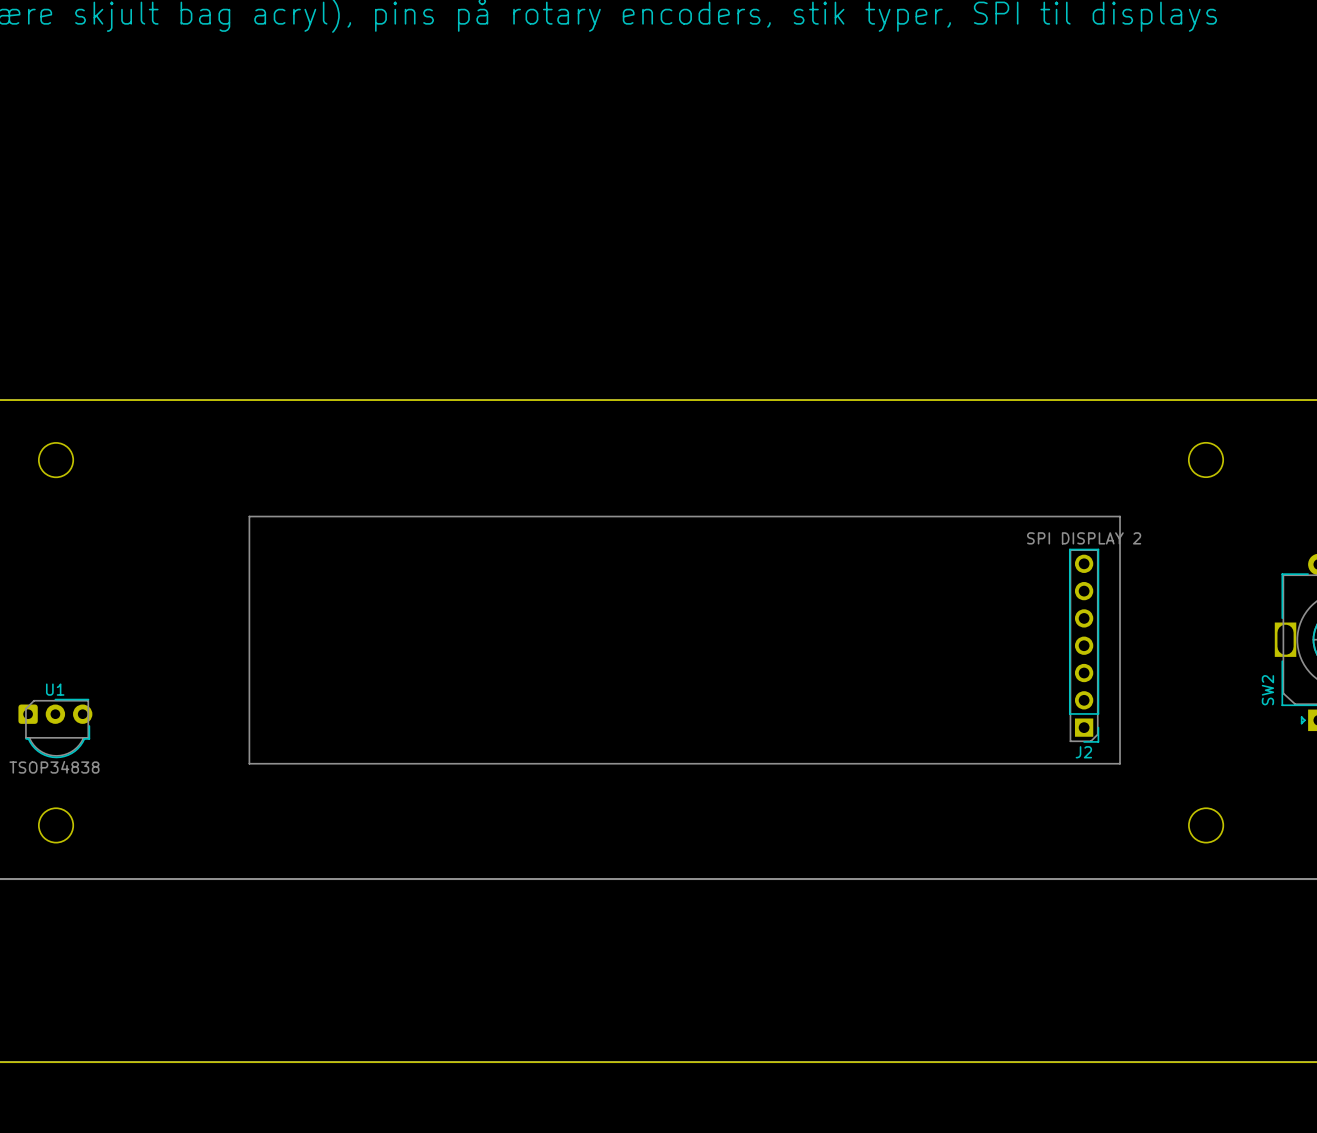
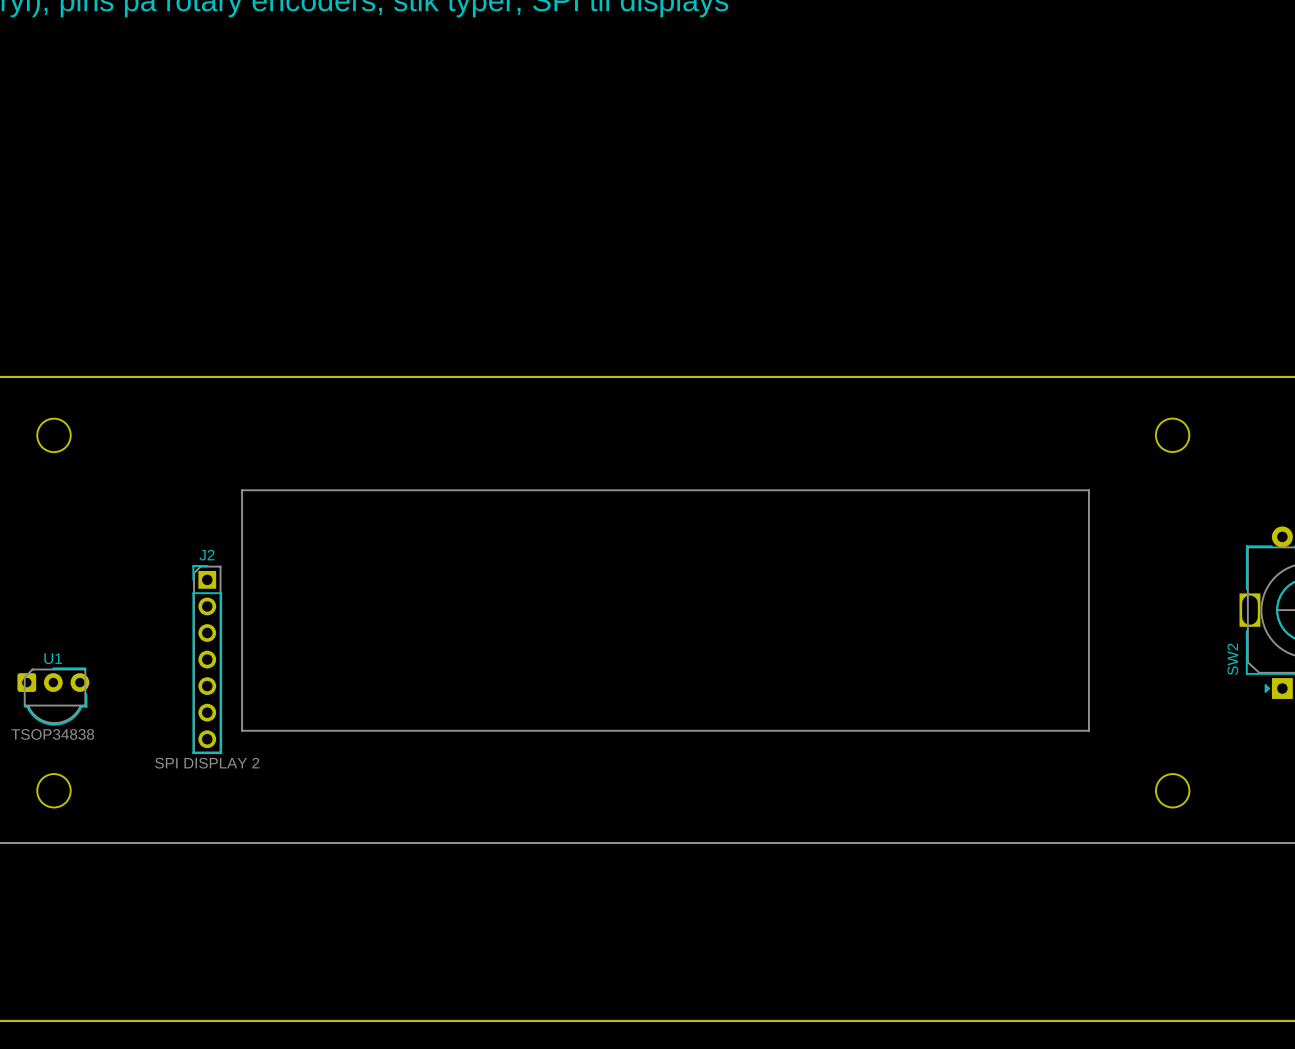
J2 rotation: 0° (1084, 645) -> 180° (207, 659)
J2 position: (1084, 645) -> (207, 659)

